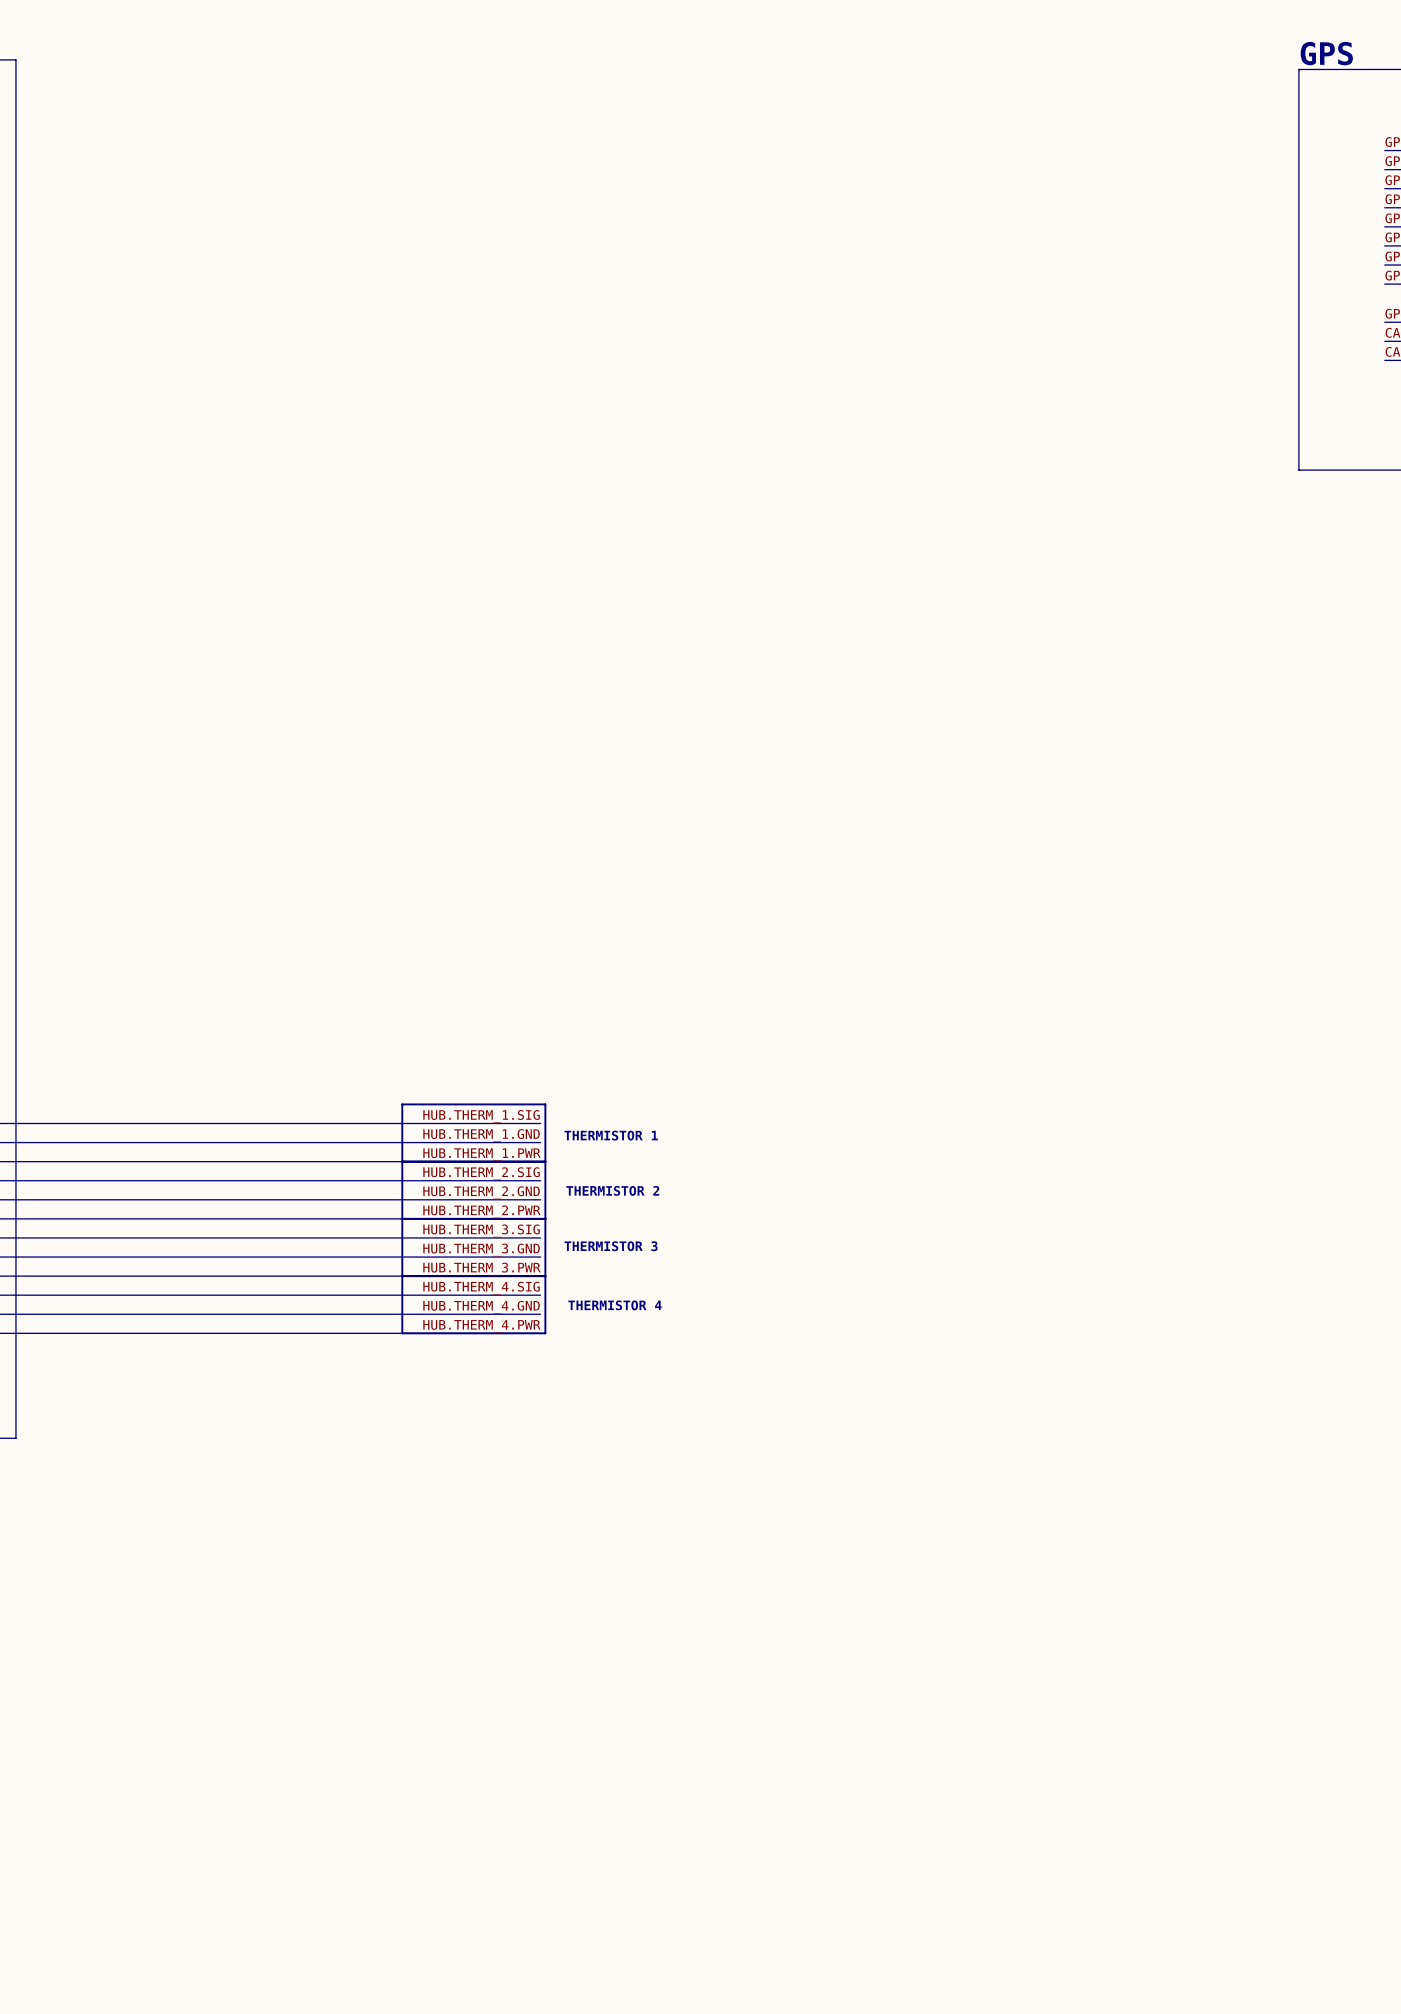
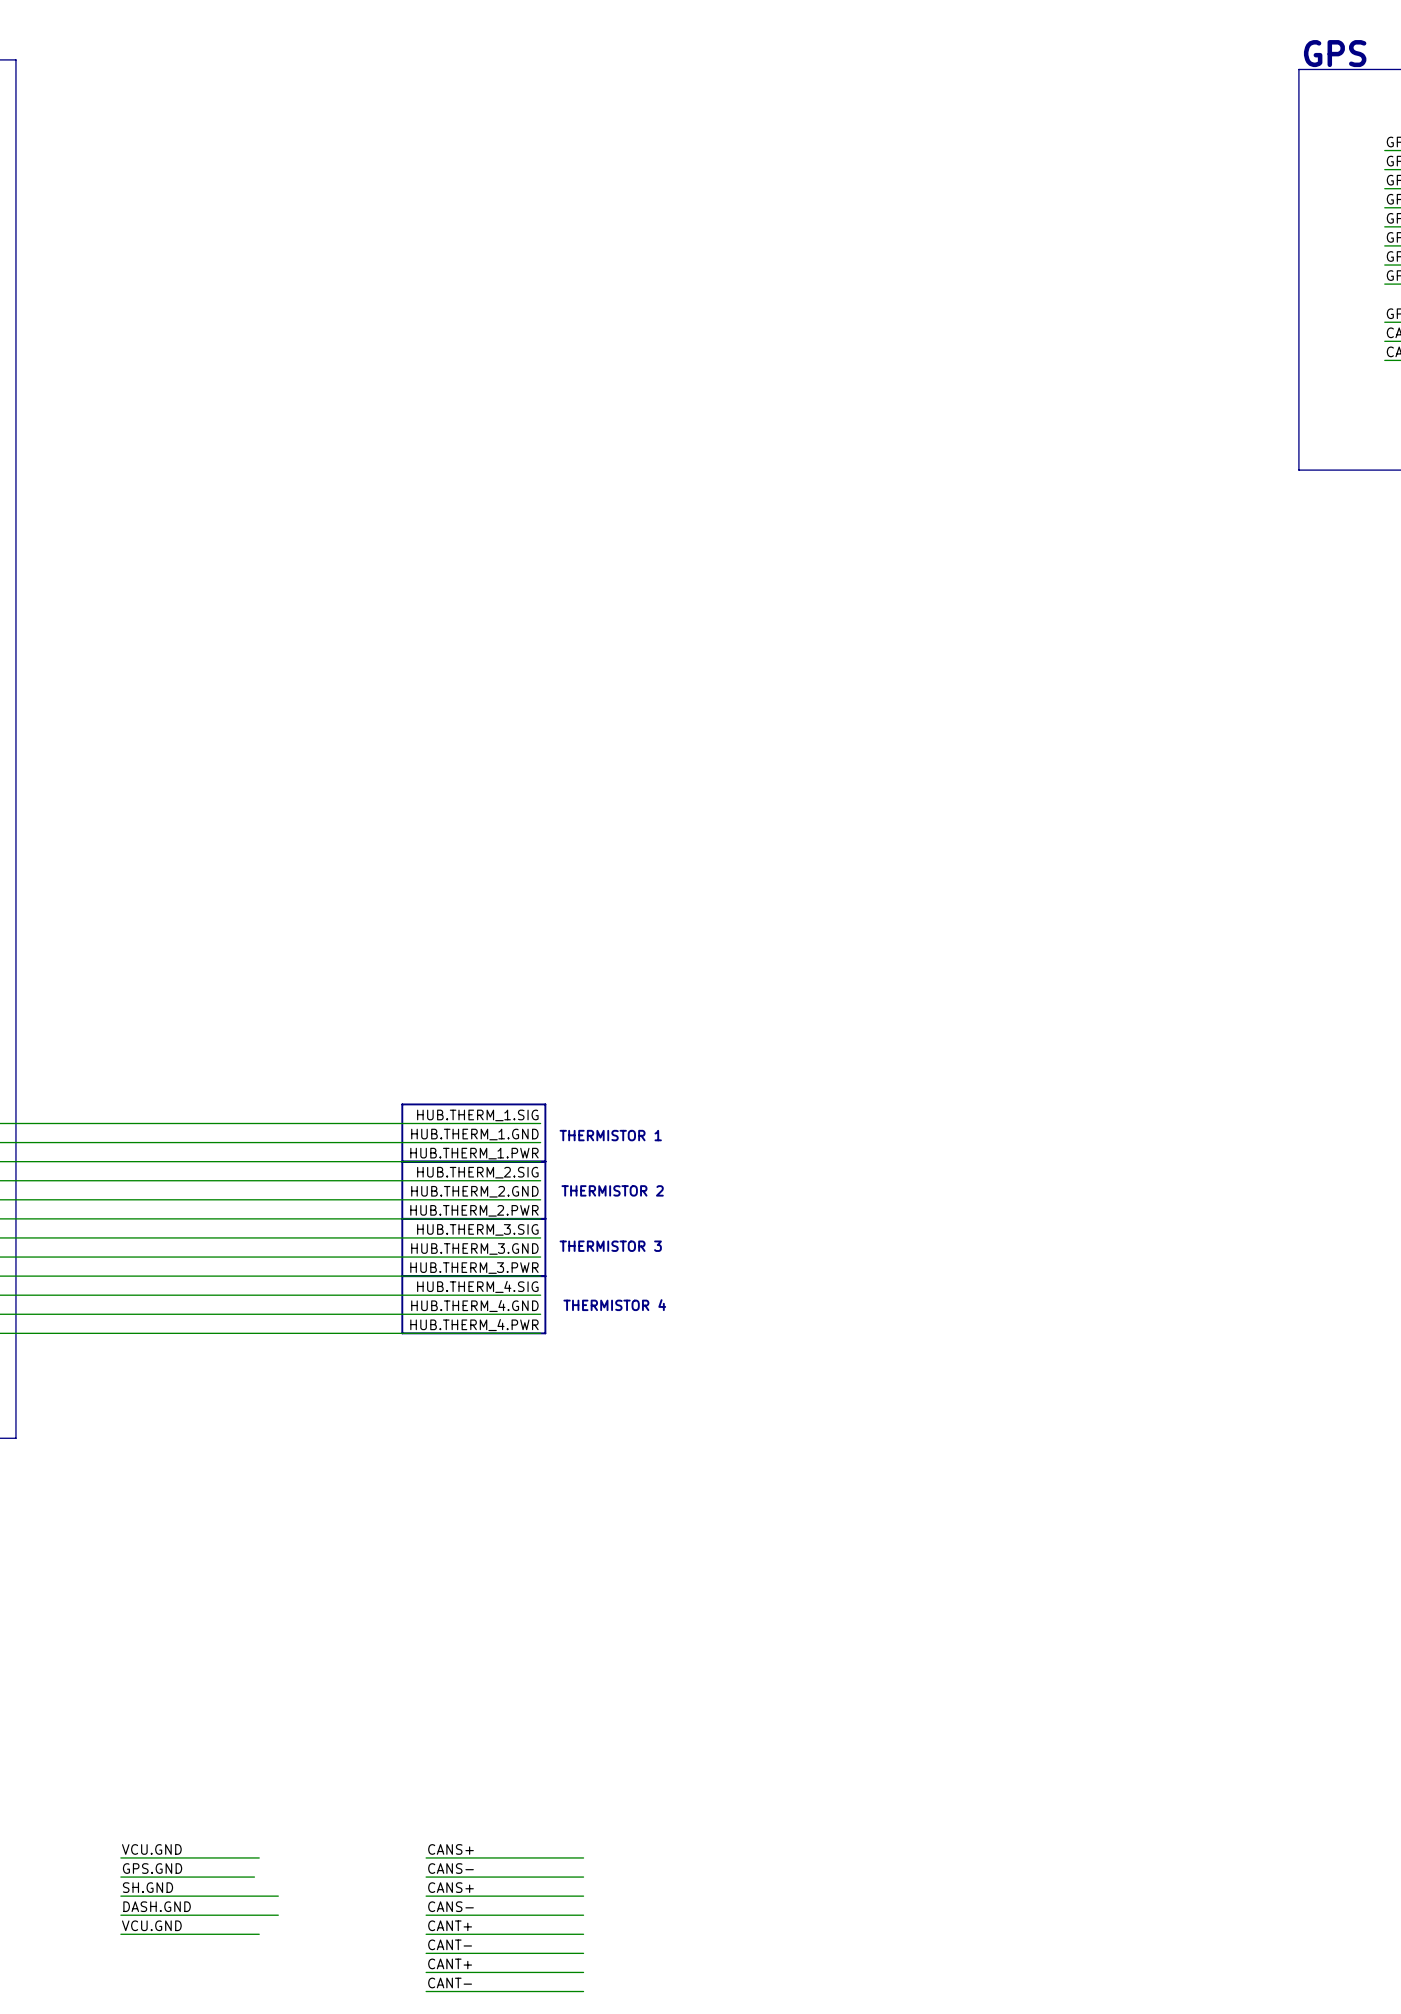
label: none -> VCU.GND (151, 1849)
label: none -> CANS+ (450, 1849)
wire: none -> (120, 1857) (259, 1857)
wire: none -> (426, 1857) (583, 1857)
label: none -> GPS.GND (152, 1868)
label: none -> CANS- (450, 1868)
wire: none -> (120, 1877) (254, 1877)
wire: none -> (426, 1877) (583, 1877)
label: none -> SH.GND (148, 1887)
label: none -> CANS+ (450, 1887)
wire: none -> (120, 1896) (278, 1896)
wire: none -> (426, 1896) (583, 1896)
label: none -> DASH.GND (157, 1906)
label: none -> CANS- (450, 1906)
wire: none -> (120, 1915) (278, 1915)
wire: none -> (426, 1915) (583, 1915)
label: none -> VCU.GND (151, 1925)
label: none -> CANT+ (450, 1925)
wire: none -> (120, 1934) (259, 1934)
wire: none -> (426, 1934) (583, 1934)
label: none -> CANT- (450, 1944)
wire: none -> (426, 1953) (583, 1953)
label: none -> CANT+ (450, 1963)
wire: none -> (426, 1972) (583, 1972)
label: none -> CANT- (450, 1983)
wire: none -> (426, 1991) (583, 1991)

